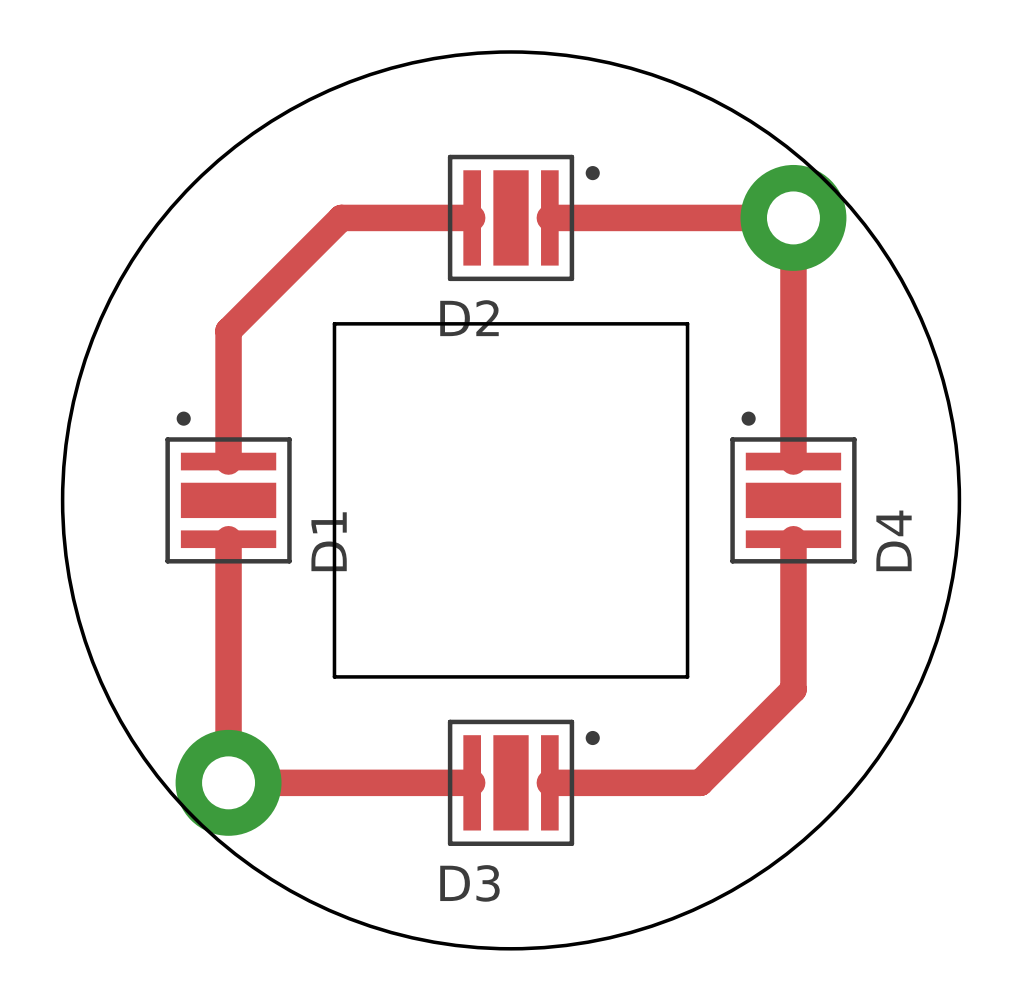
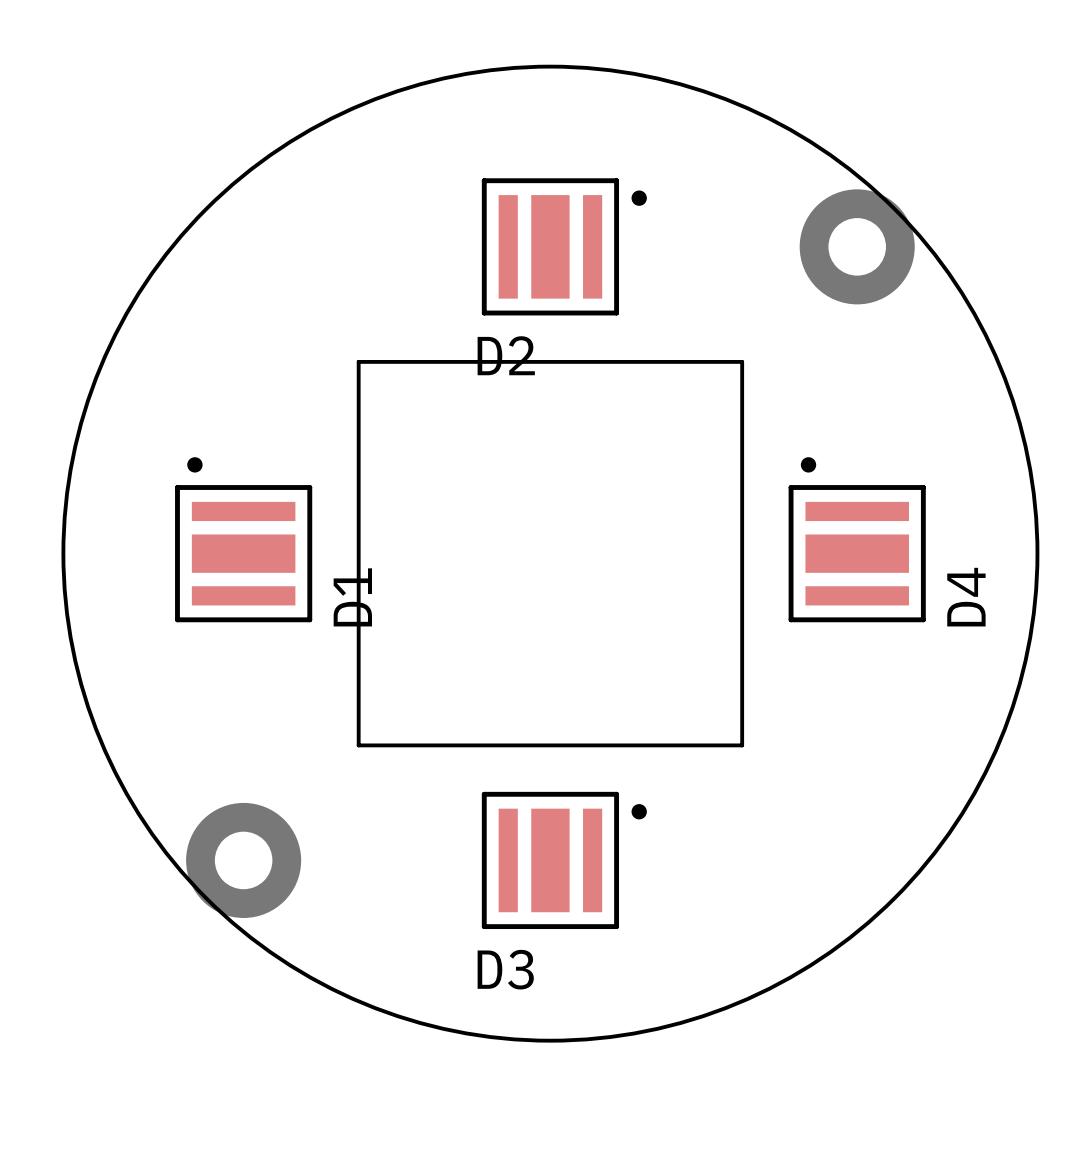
top track: (472, 217) (341, 217) (228, 330) (228, 461) -> none
top track: (549, 217) (793, 217) (793, 461) -> none
top track: (228, 539) (228, 782) (472, 782) -> none
top track: (793, 539) (793, 689) (700, 782) (549, 782) -> none

